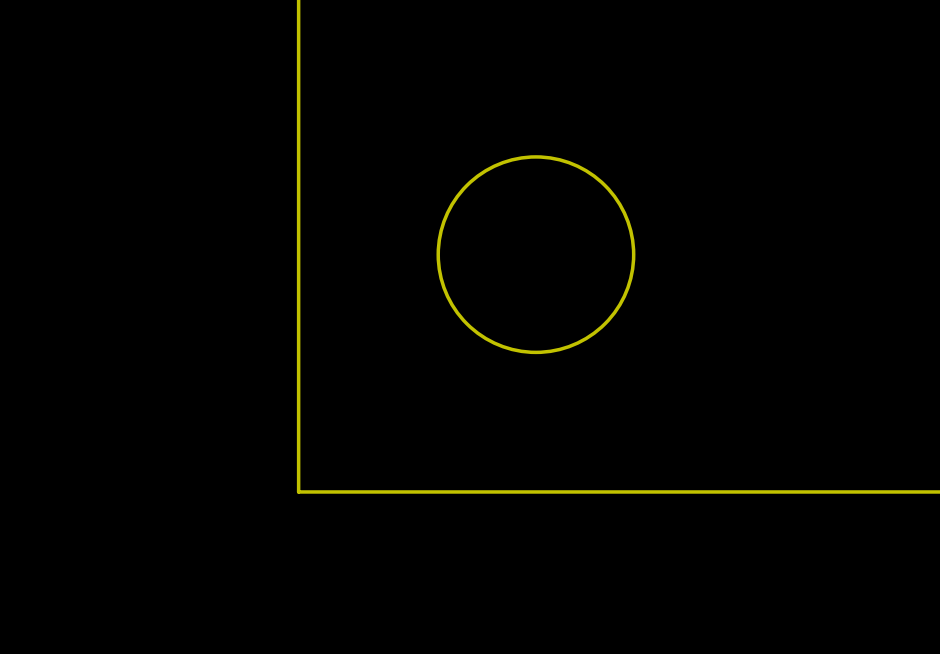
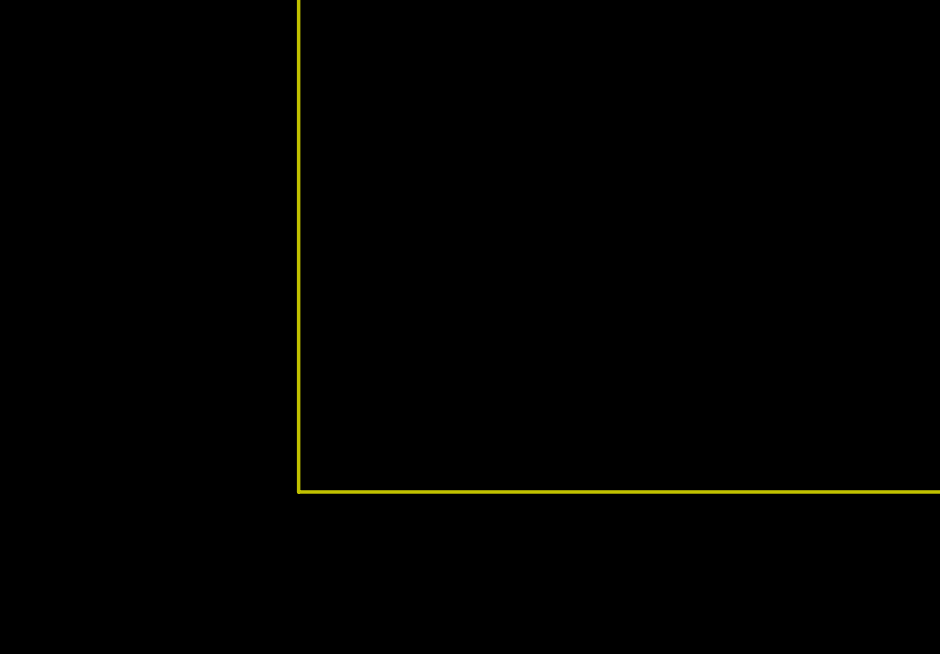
round board edge: [436, 155, 636, 355] -> none

